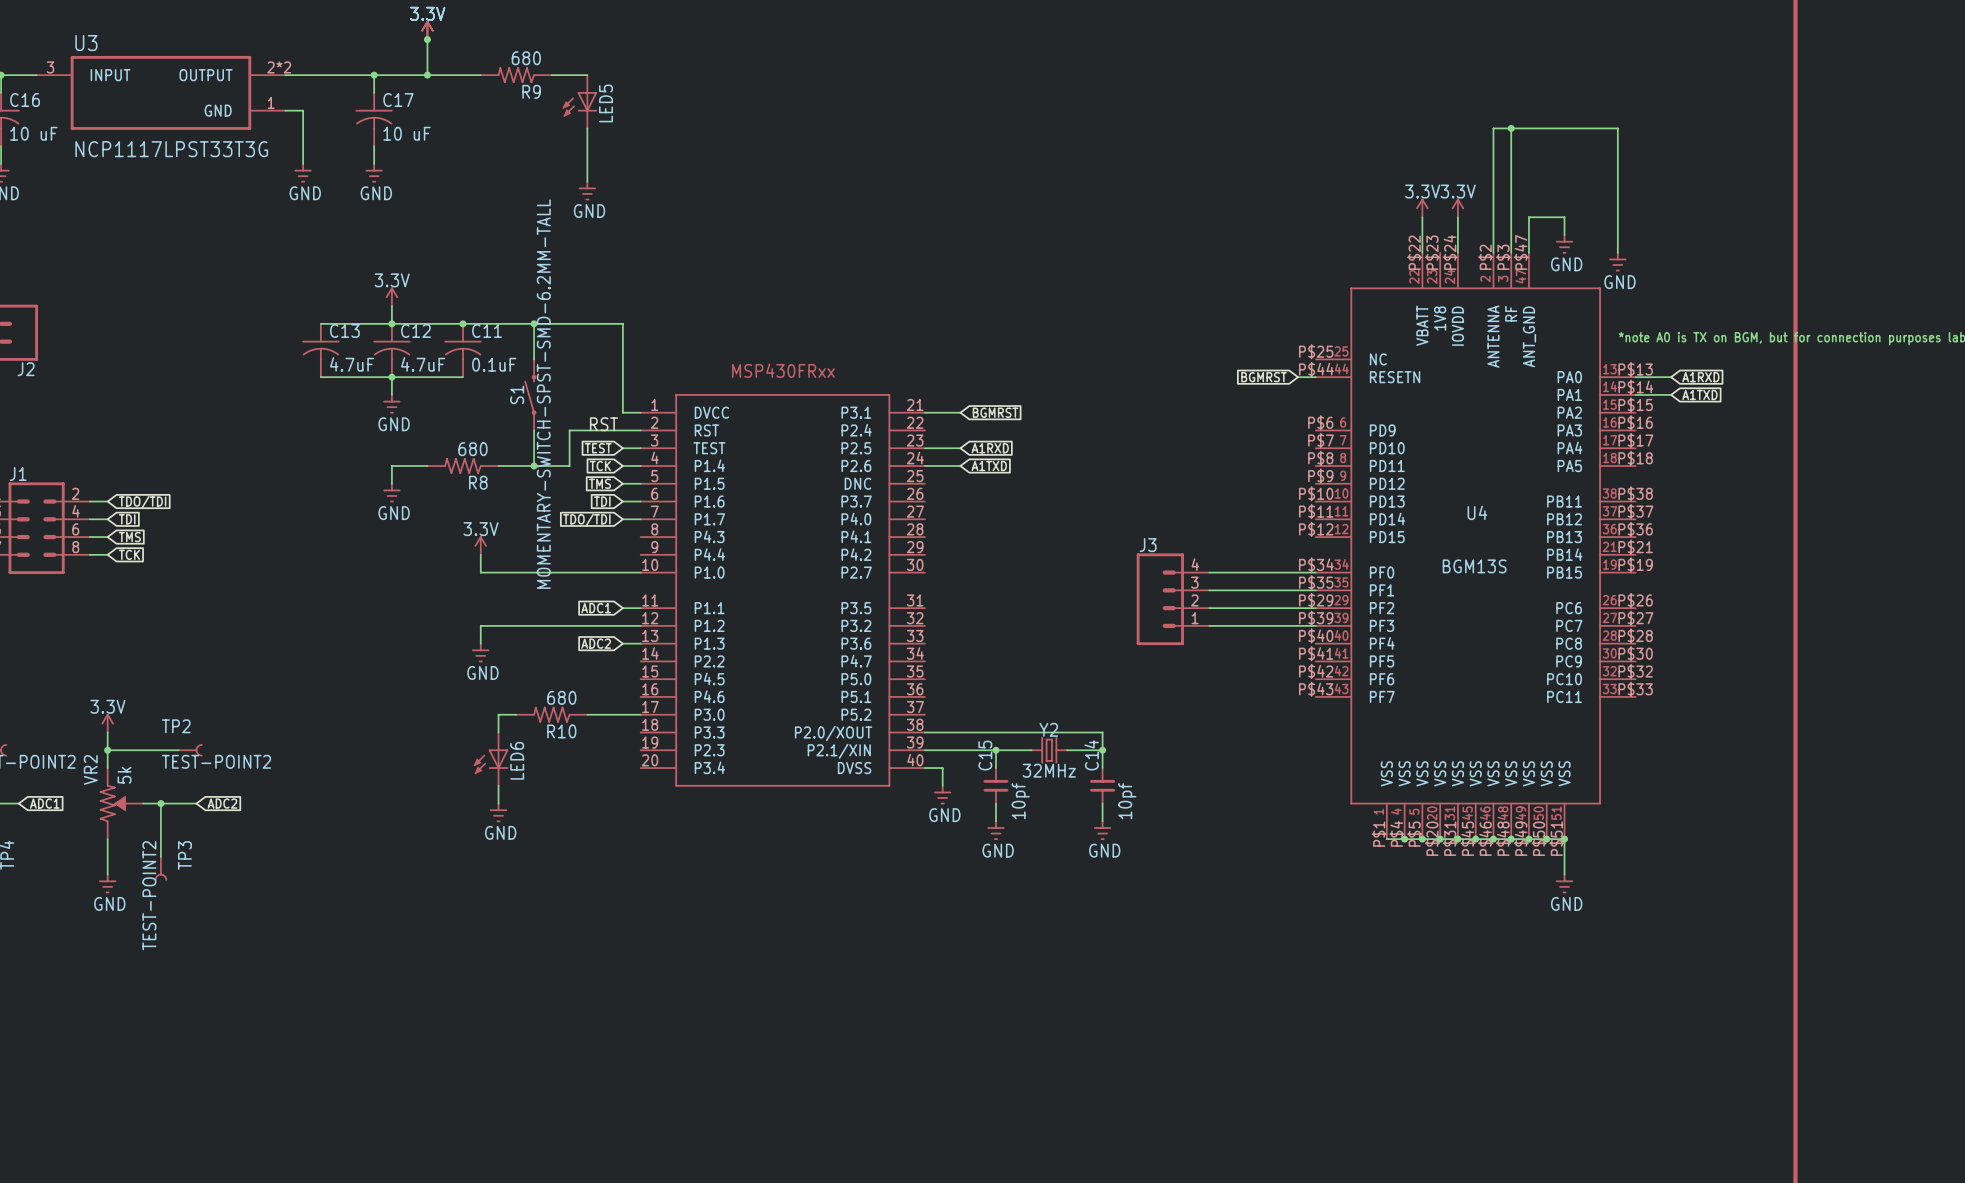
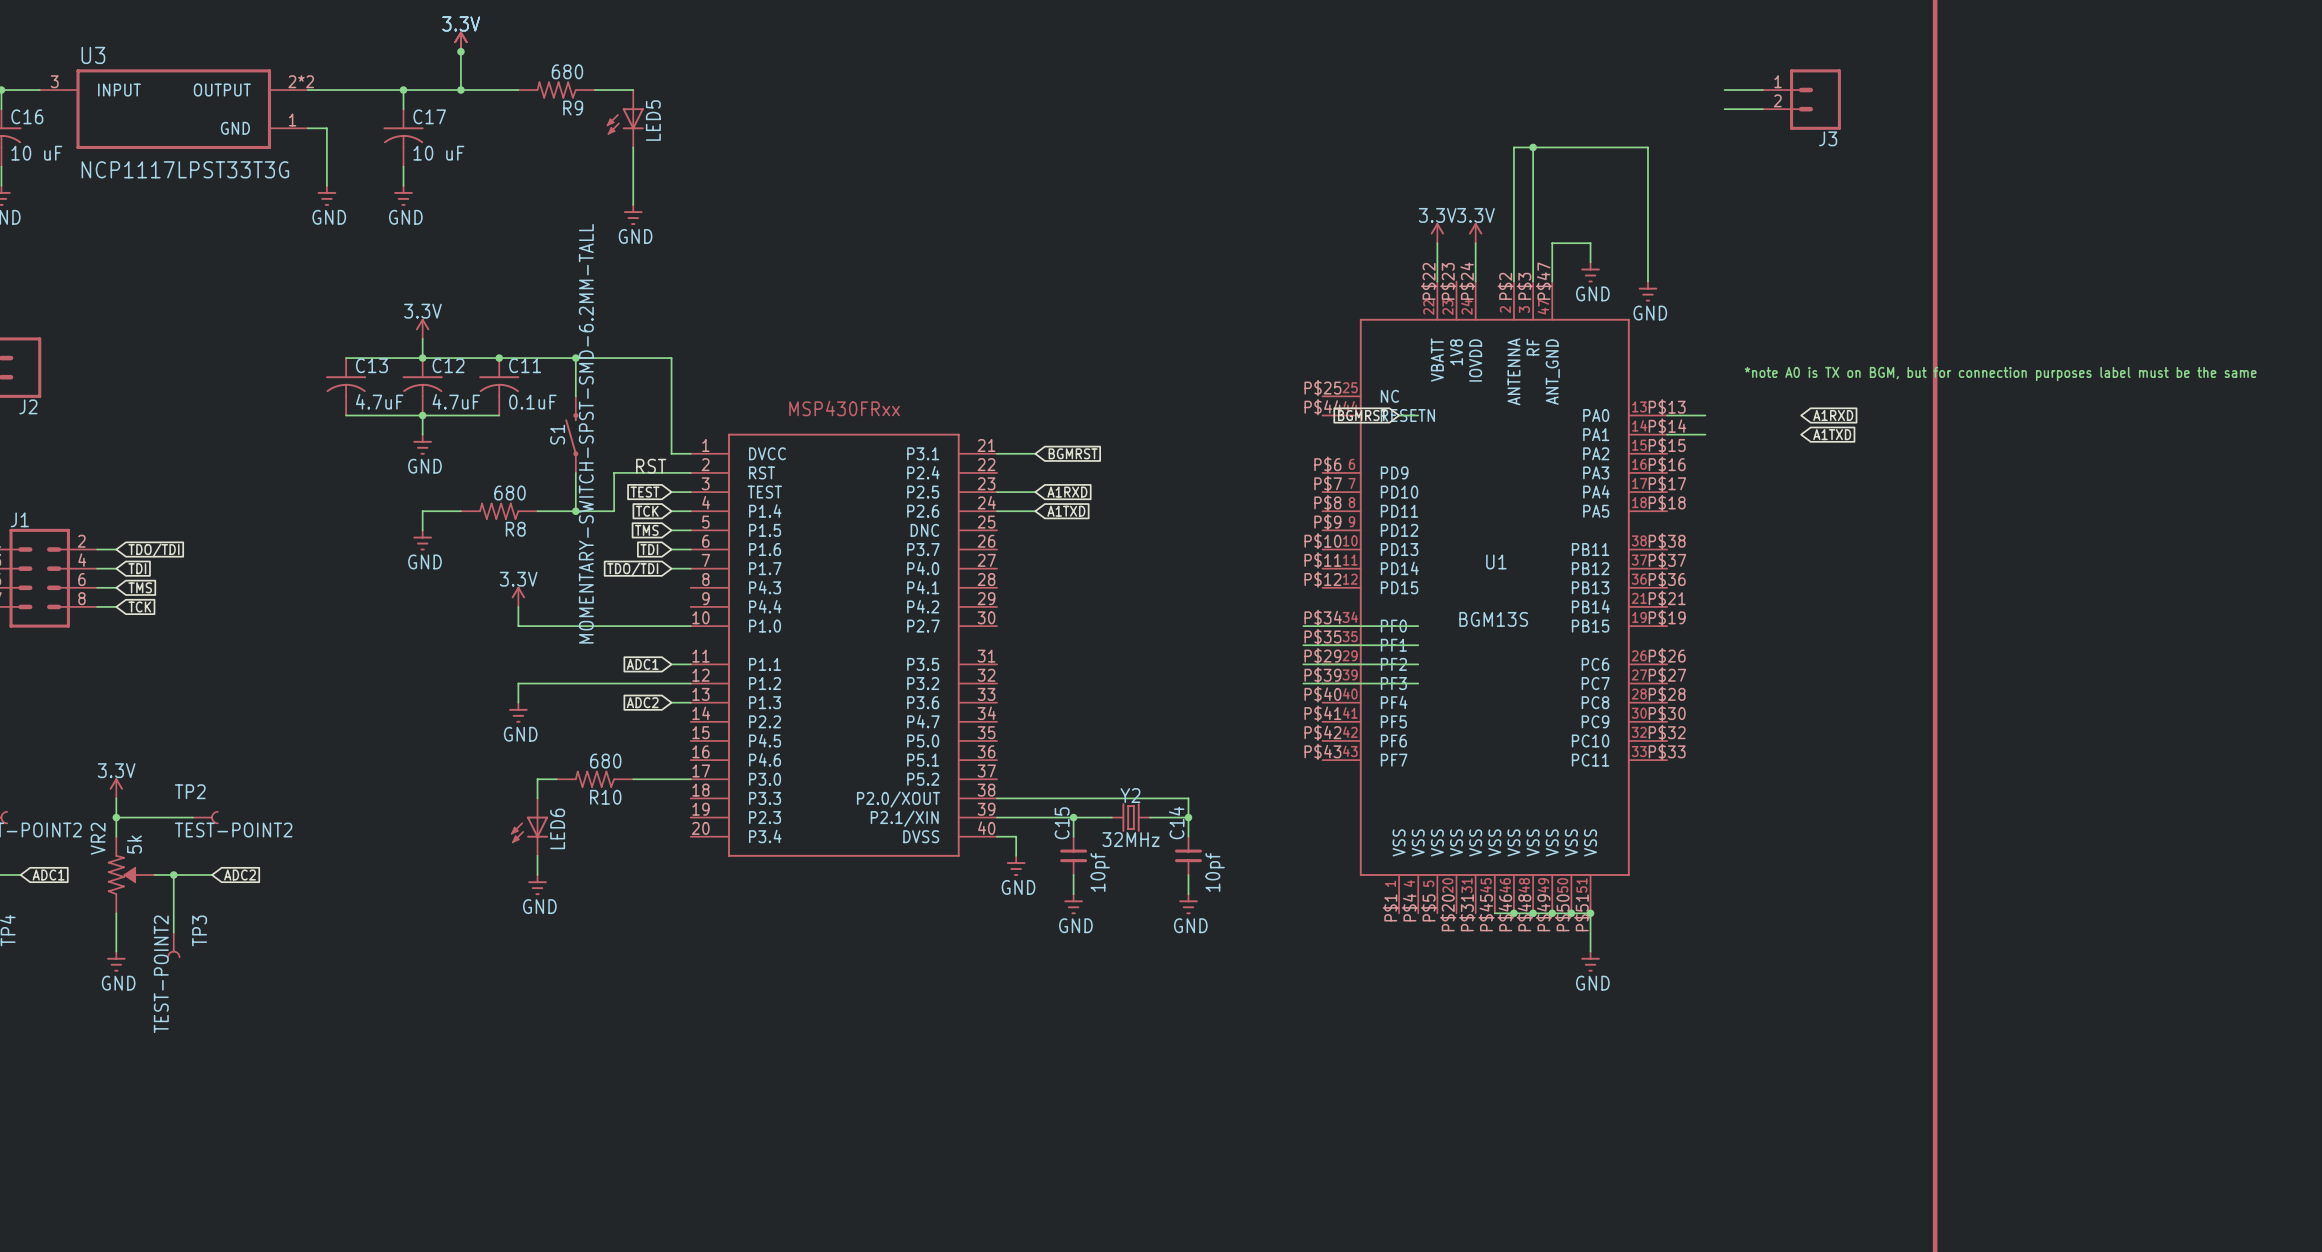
wire: none -> (1724, 90) (1762, 90)
wire: none -> (1724, 109) (1762, 109)
wire: none -> (1533, 147) (1533, 243)
junction: none -> (1533, 147)
wire: (1493, 128) (1493, 252) -> (1609, 147) (1513, 147) (1513, 281)
wire: (1511, 128) (1511, 252) -> none
junction: (1511, 128) -> none
wire: (1528, 128) (1617, 128) (1617, 252) -> (1647, 147) (1647, 243)
power symbol: none -> 3.3V (1437, 233)
power symbol: none -> 3.3V (1475, 233)
power symbol: 3.3V (1422, 207) -> none
power symbol: 3.3V (1457, 207) -> none
wire: none -> (1437, 243) (1437, 281)
wire: (1457, 217) (1457, 252) -> (1475, 243) (1475, 281)
wire: (1528, 217) (1564, 217) (1564, 235) -> none
wire: none -> (1590, 262) (1590, 243) (1552, 243) (1552, 281)
power symbol: none -> GND (1590, 272)
power symbol position: GND (1564, 244) -> GND (1647, 291)
power symbol: GND (1617, 261) -> none
wire: (1635, 377) (1671, 377) -> (1667, 415) (1705, 415)
wire: (1635, 394) (1671, 394) -> (1667, 434) (1705, 434)
J3 name position: J3 (1148, 545) -> J3 (1828, 138)
U1: none -> BGM13S (1494, 597)
U4: BGM13S (1475, 545) -> none
J3 symbol: [1136, 553, 1210, 646] -> [1762, 69, 1841, 130]
wire: (1475, 839) (1564, 839) (1564, 874) -> (1590, 913) (1590, 951)
junction: (1493, 839) -> none
junction: (1511, 839) -> none
junction: (1528, 839) -> none
junction: (1546, 839) -> none
junction: (1564, 839) -> none
power symbol position: GND (1564, 883) -> GND (1590, 961)

